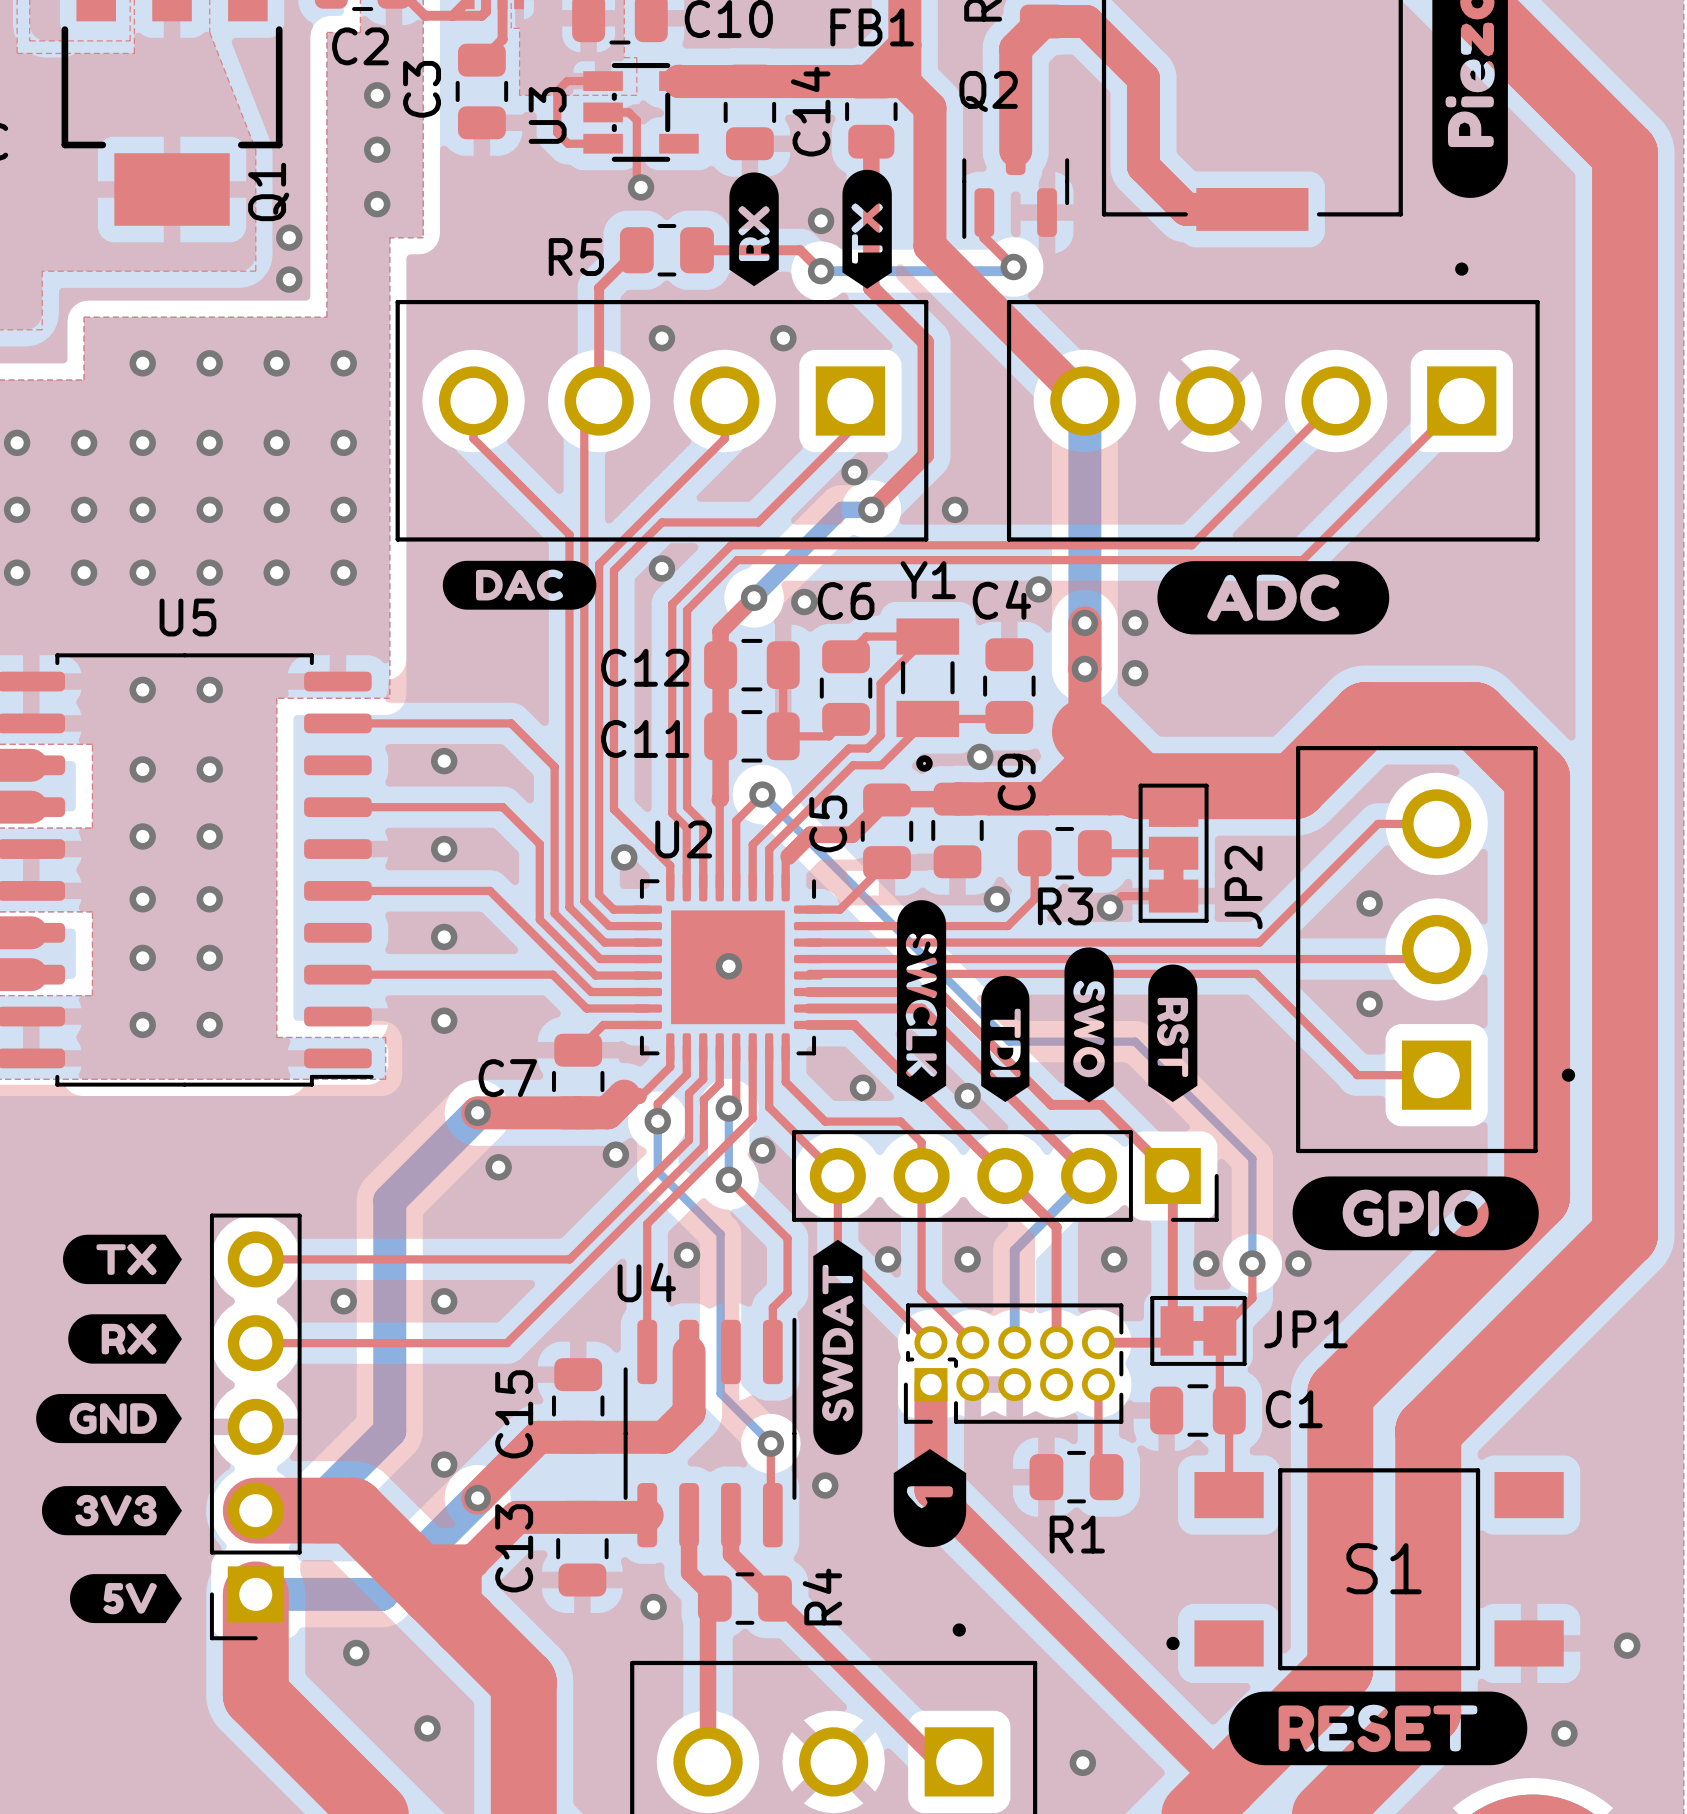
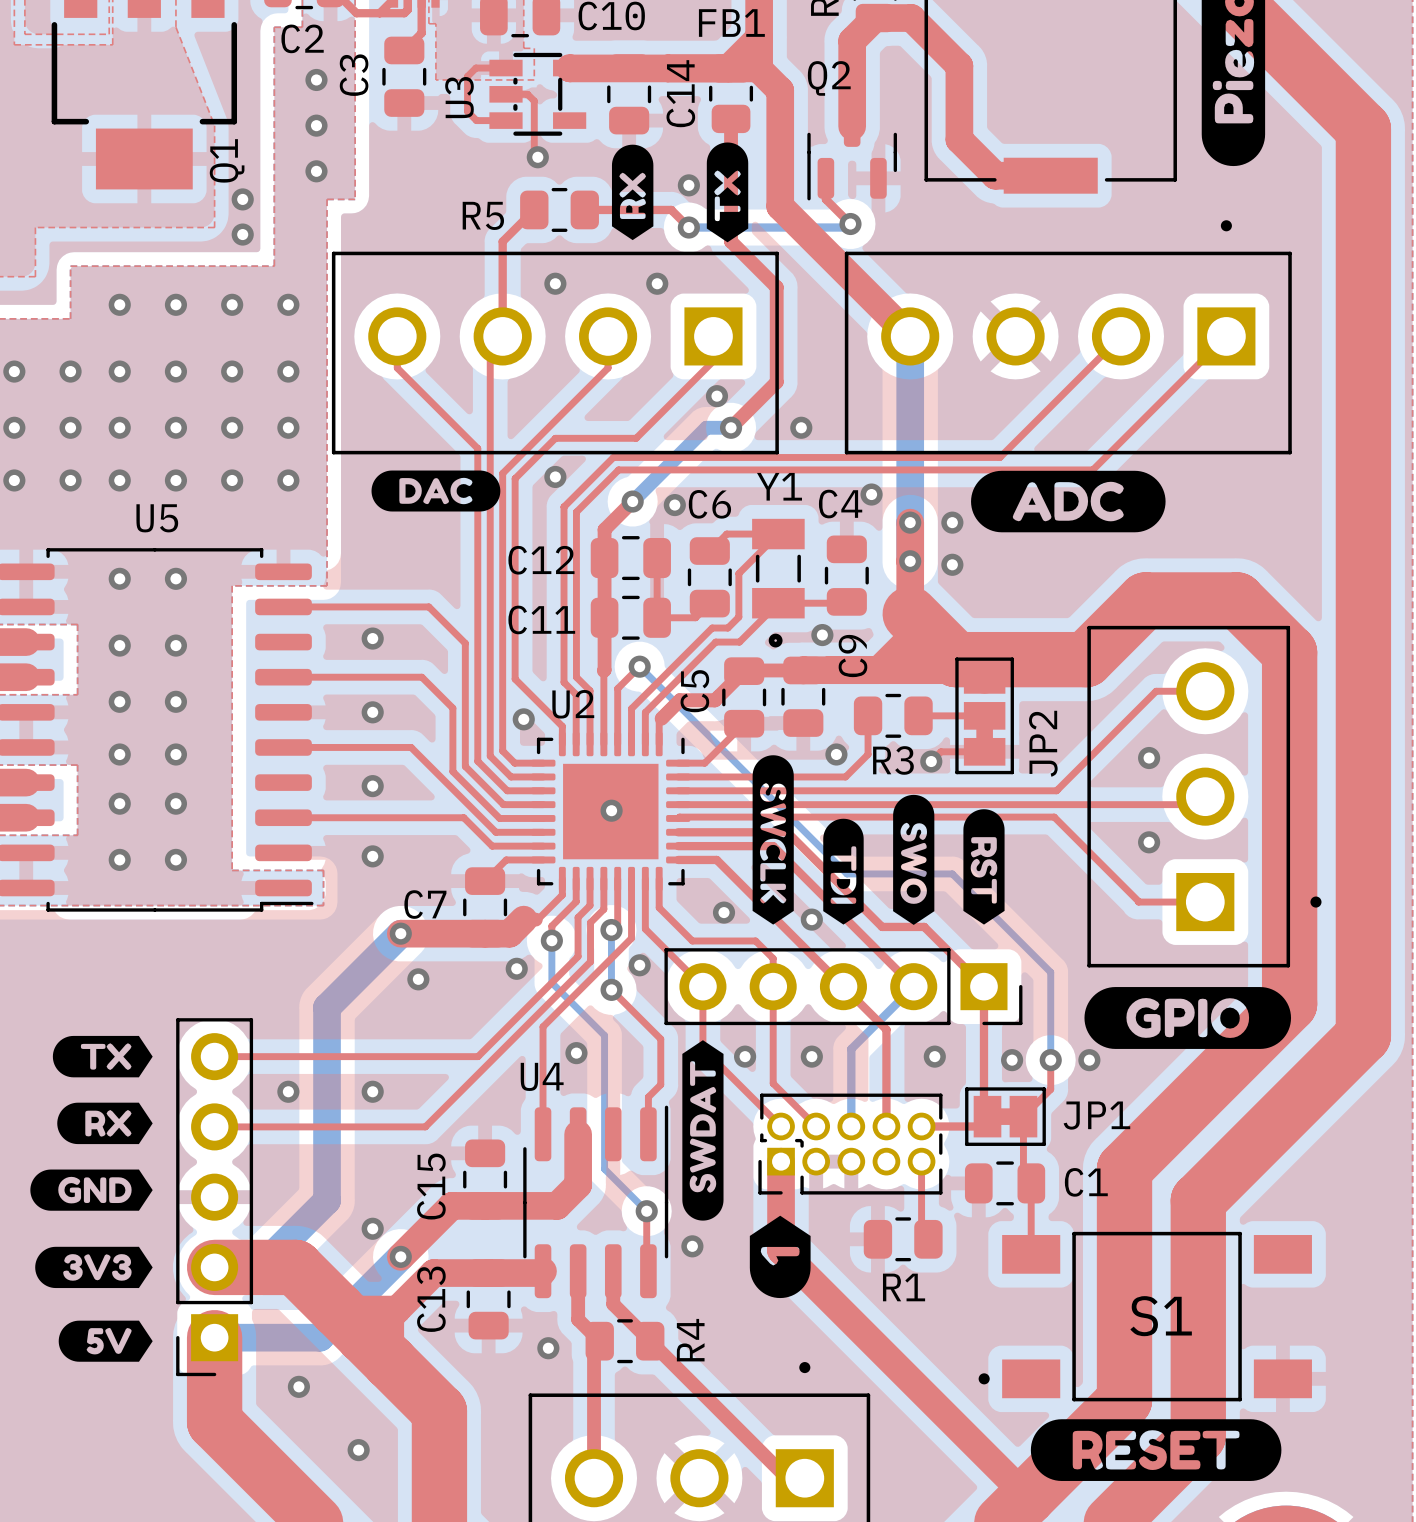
via: (1627, 1645) -> none
via: (1564, 1733) -> none
via: (1082, 1762) -> none

